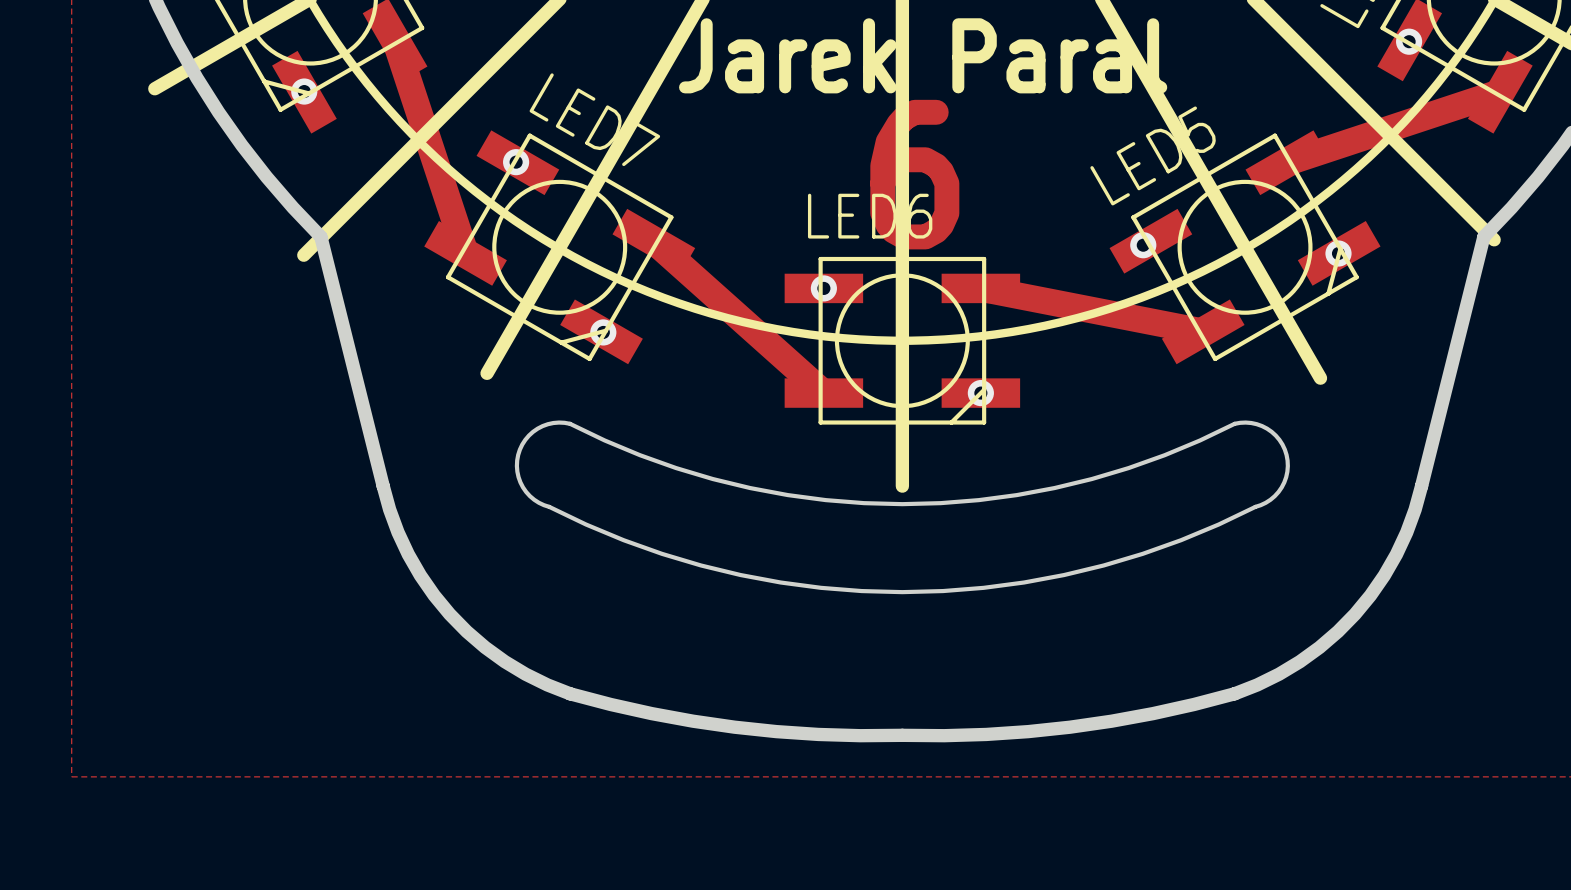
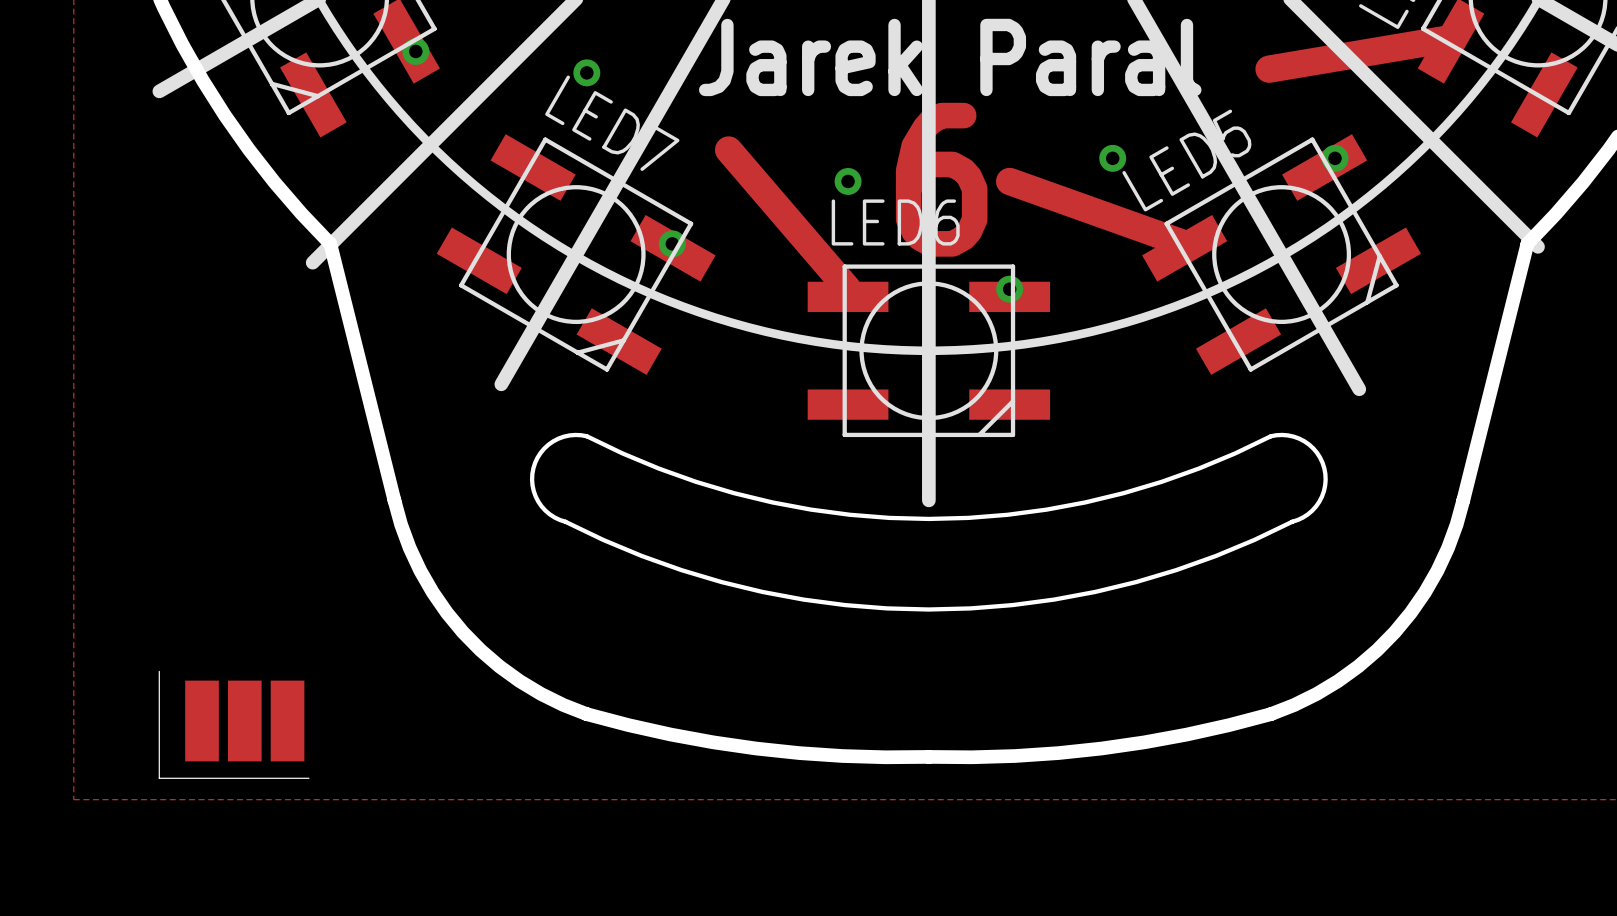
track: none -> (1446, 39) (1269, 69)
track: (395, 39) (465, 253) -> none
via: (1409, 41) -> none
via: none -> (415, 51)
via: none -> (586, 72)
via: (304, 91) -> none
track: (1500, 92) (1286, 162) -> none
track: none -> (728, 149) (848, 289)
via: none -> (1112, 158)
via: none -> (1335, 158)
via: (516, 162) -> none
via: none -> (848, 181)
track: none -> (1009, 181) (1182, 243)
via: none -> (672, 243)
track: (653, 241) (823, 393) -> none
via: (1143, 245) -> none
via: (1338, 253) -> none
via: none -> (1009, 289)
via: (823, 288) -> none
track: (980, 288) (1203, 331) -> none
via: (603, 332) -> none
via: (980, 393) -> none
part: none -> (234, 724)

